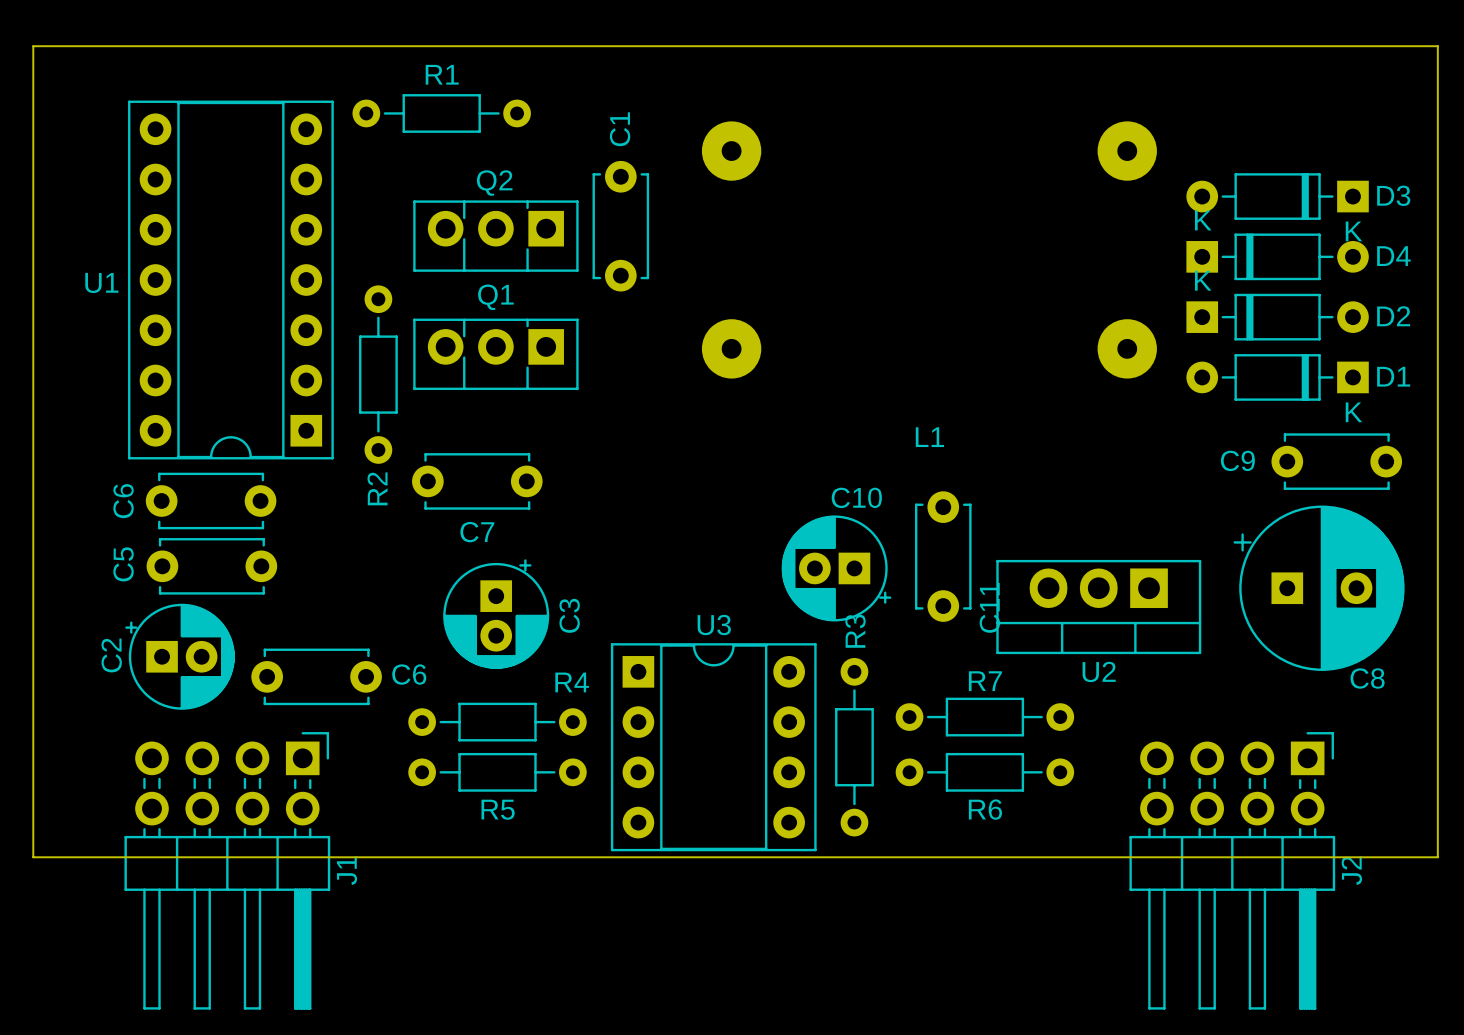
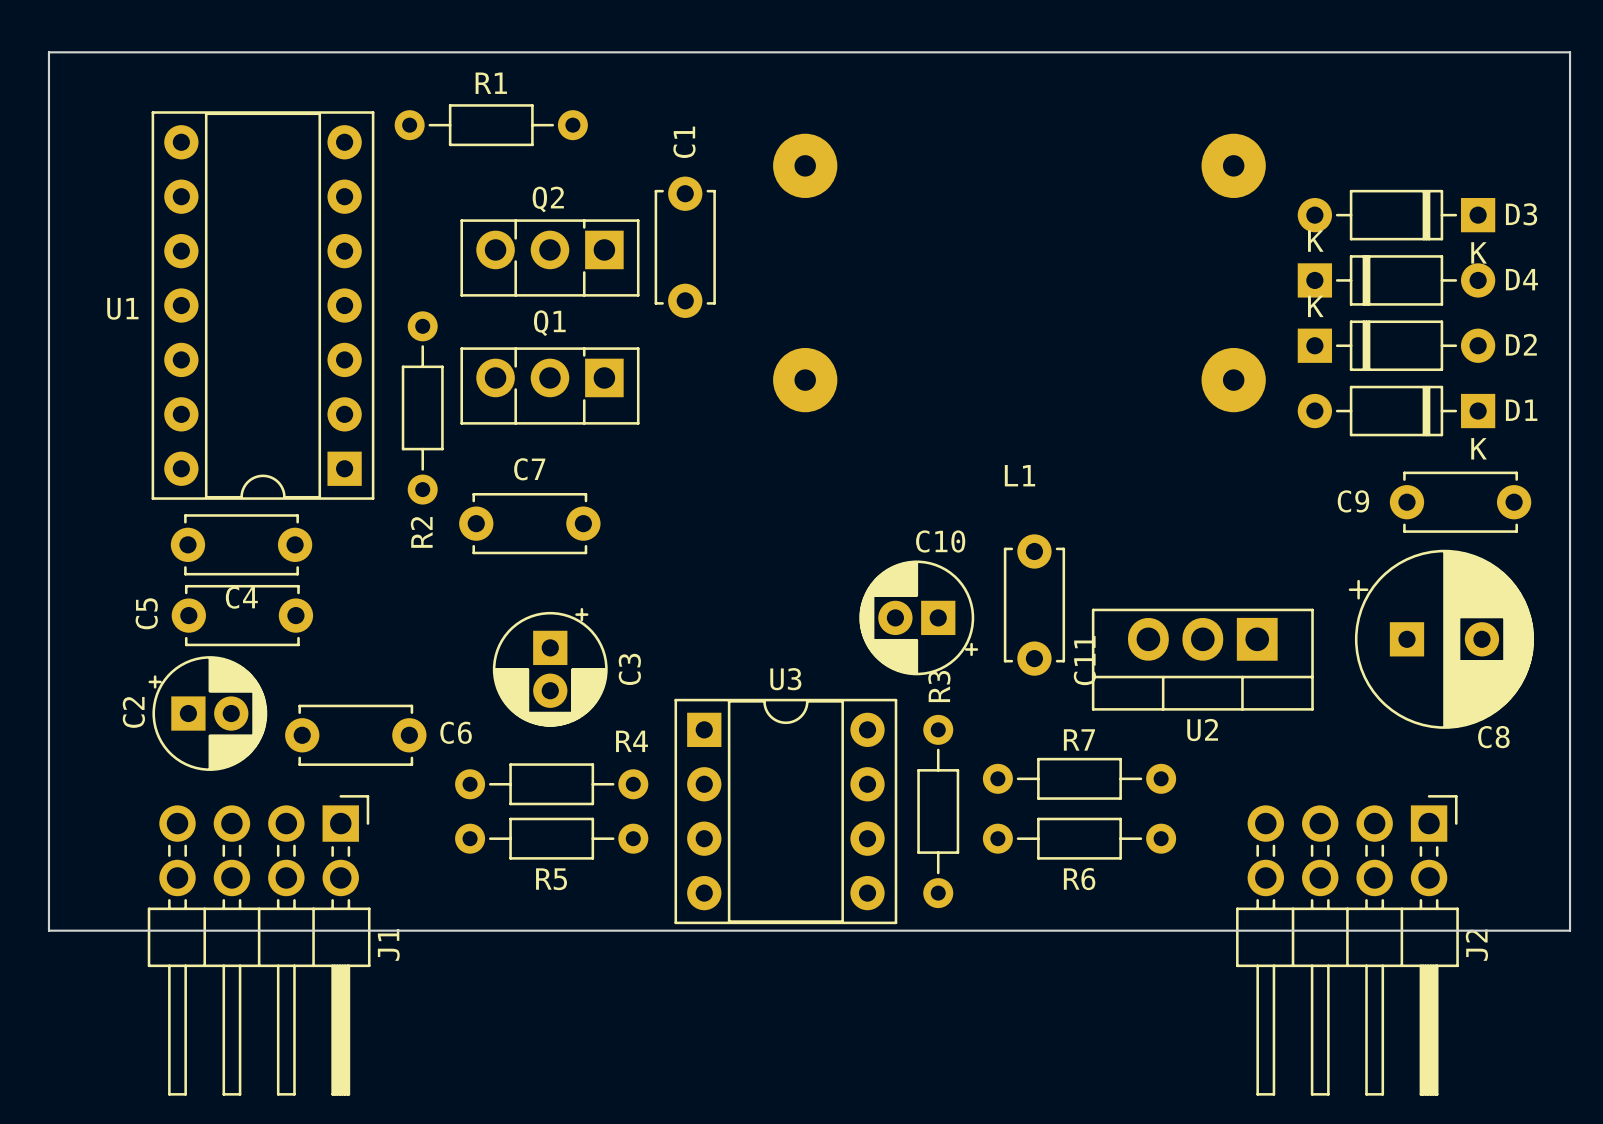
C6 name: C6 (123, 501) -> C4 (241, 597)
C7 name position: C7 (477, 532) -> C7 (529, 469)

